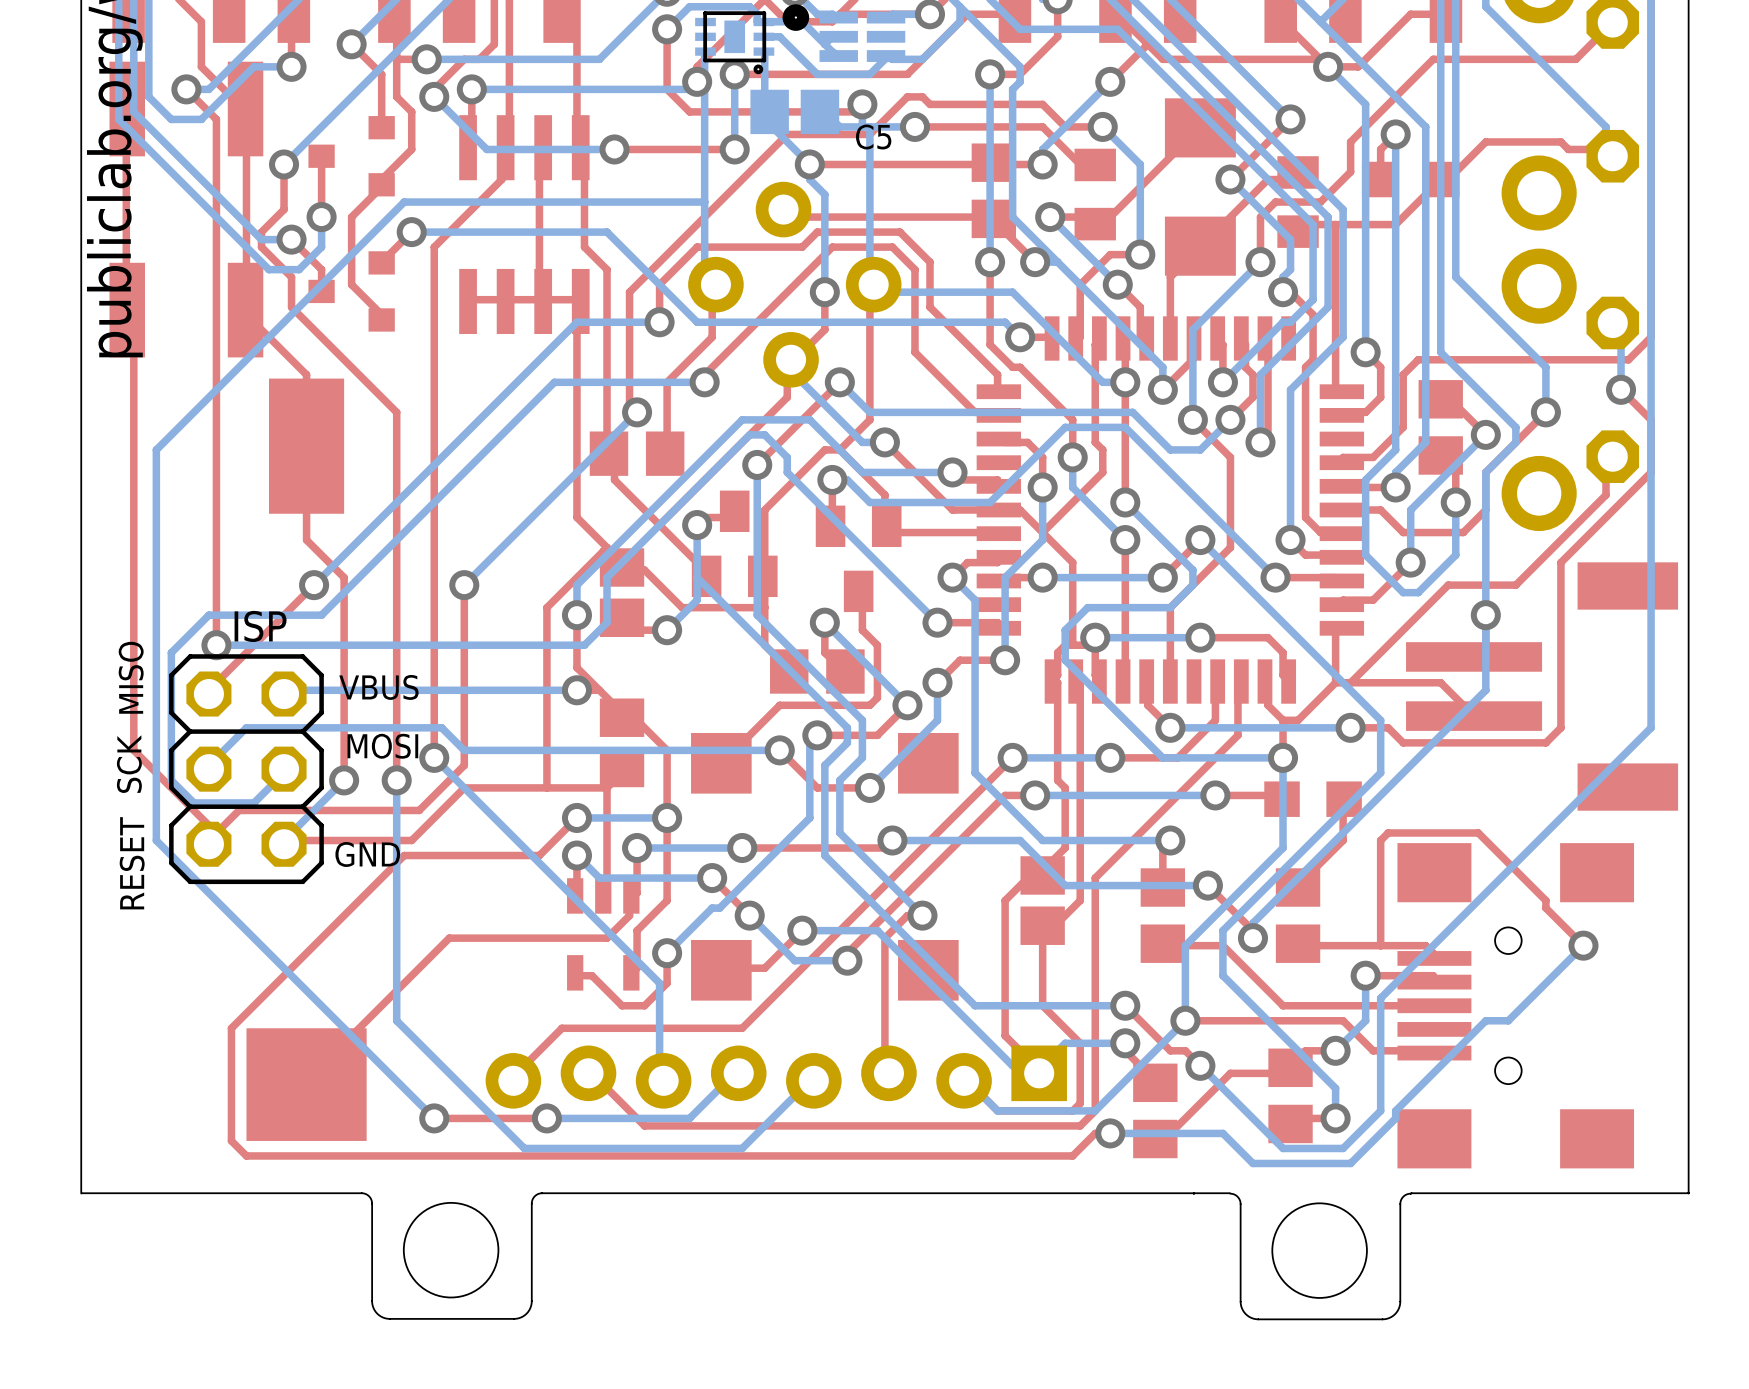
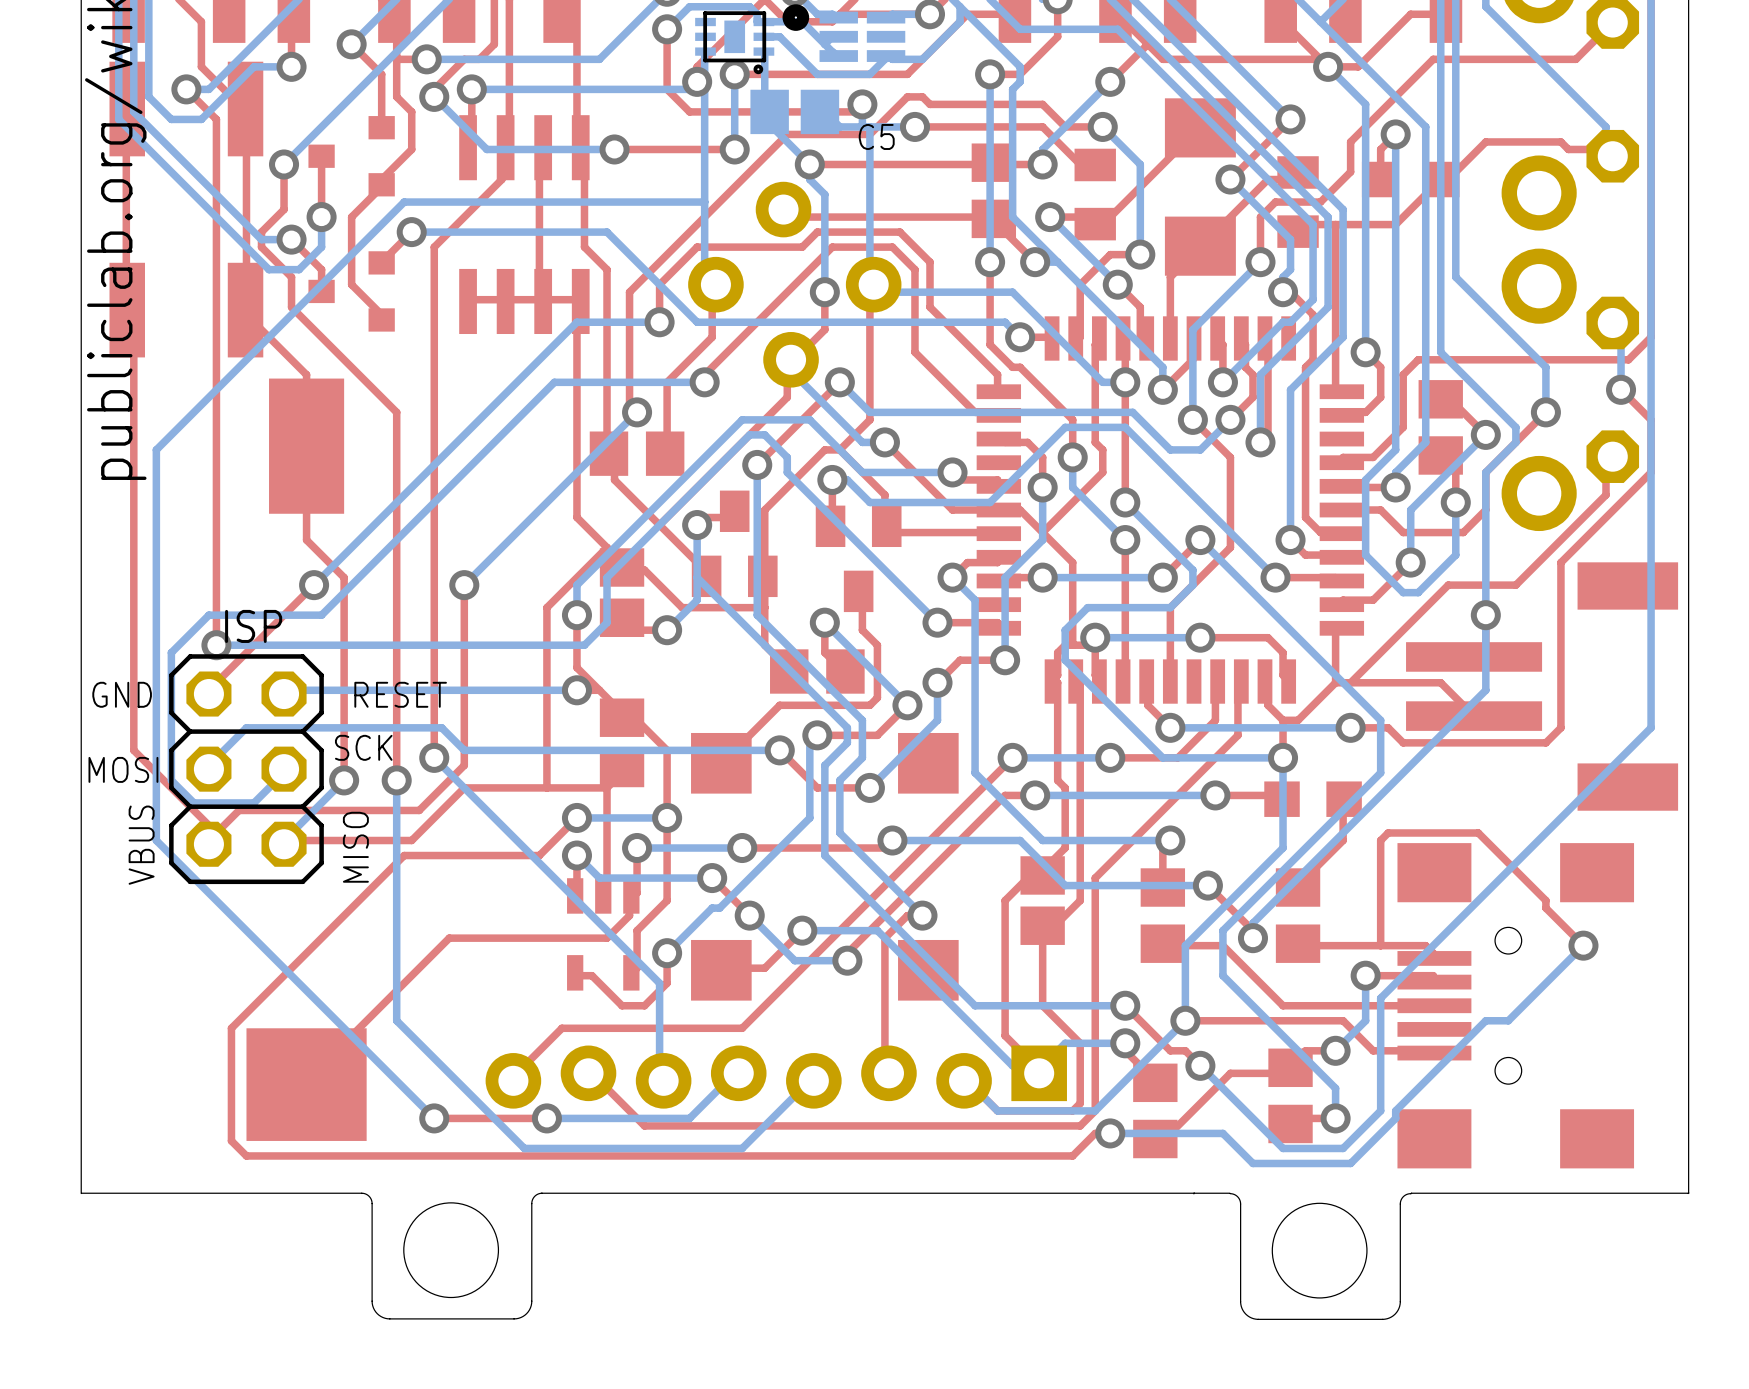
text position: MISO (131, 677) -> MISO (355, 847)
text rotation: 0° (378, 687) -> 90° counterclockwise (141, 845)
text position: VBUS (378, 687) -> VBUS (141, 845)
text position: MOSI (382, 746) -> MOSI (123, 769)
text rotation: 0° (129, 764) -> 90° clockwise (363, 747)
text position: SCK (129, 764) -> SCK (363, 747)
text position: GND (367, 854) -> GND (122, 694)
text rotation: 0° (132, 863) -> 90° clockwise (400, 694)
text position: RESET (132, 863) -> RESET (400, 694)

